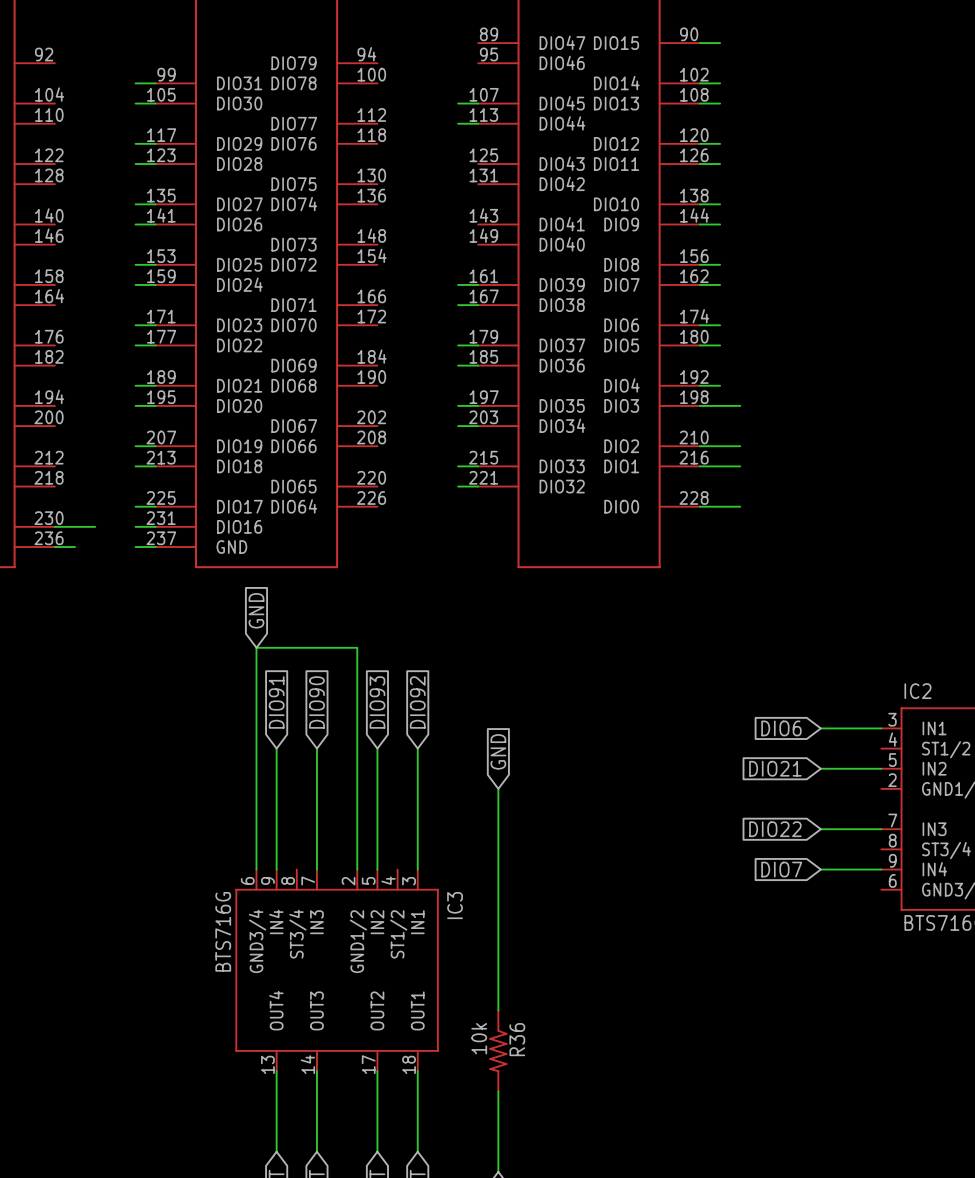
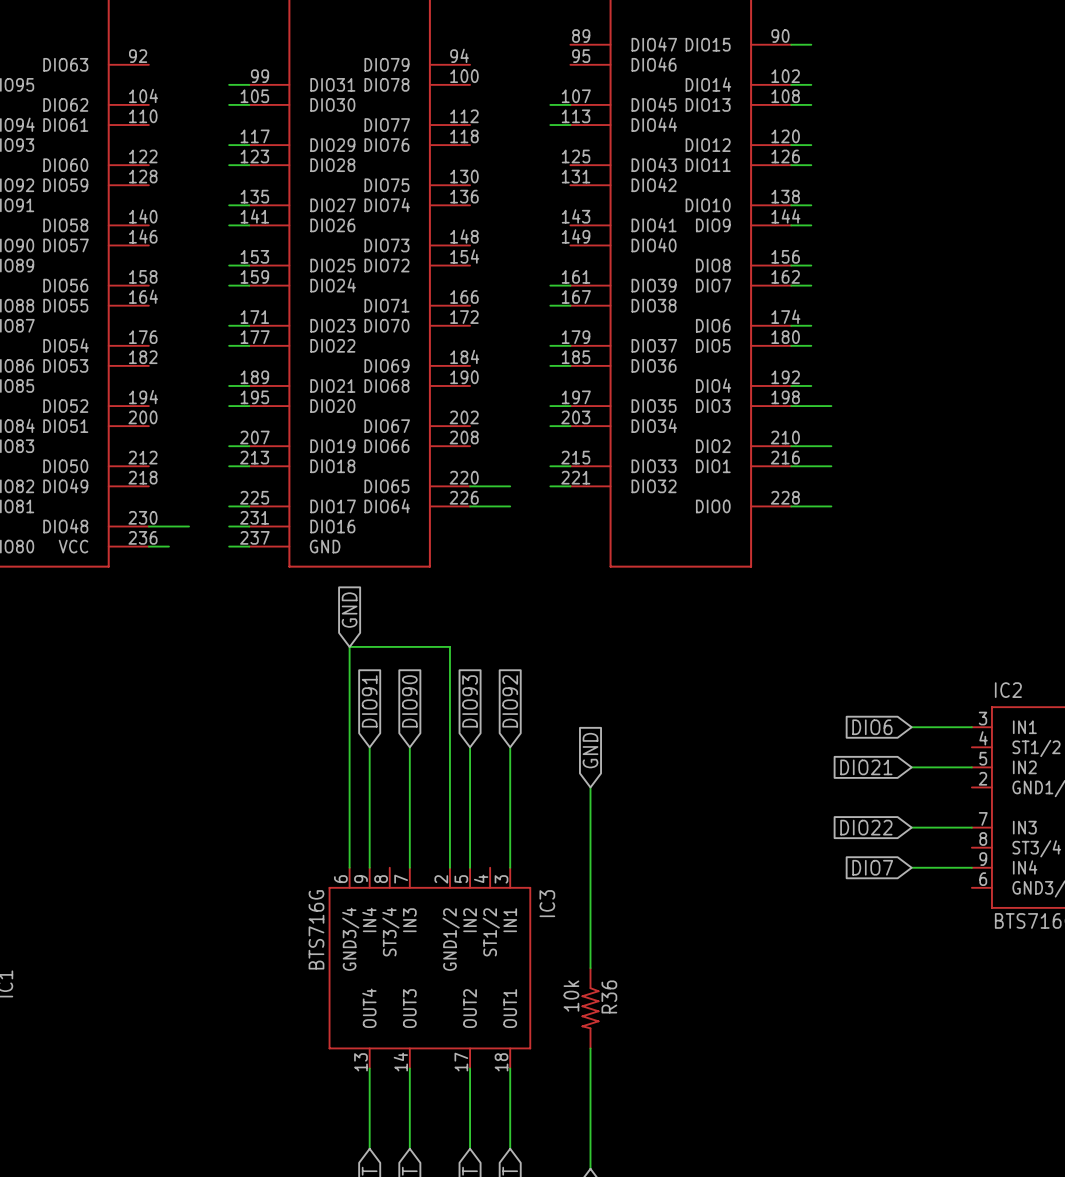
wire: none -> (470, 486) (510, 486)
wire: none -> (470, 506) (510, 506)
R36 position: (498, 1050) -> (590, 1008)

